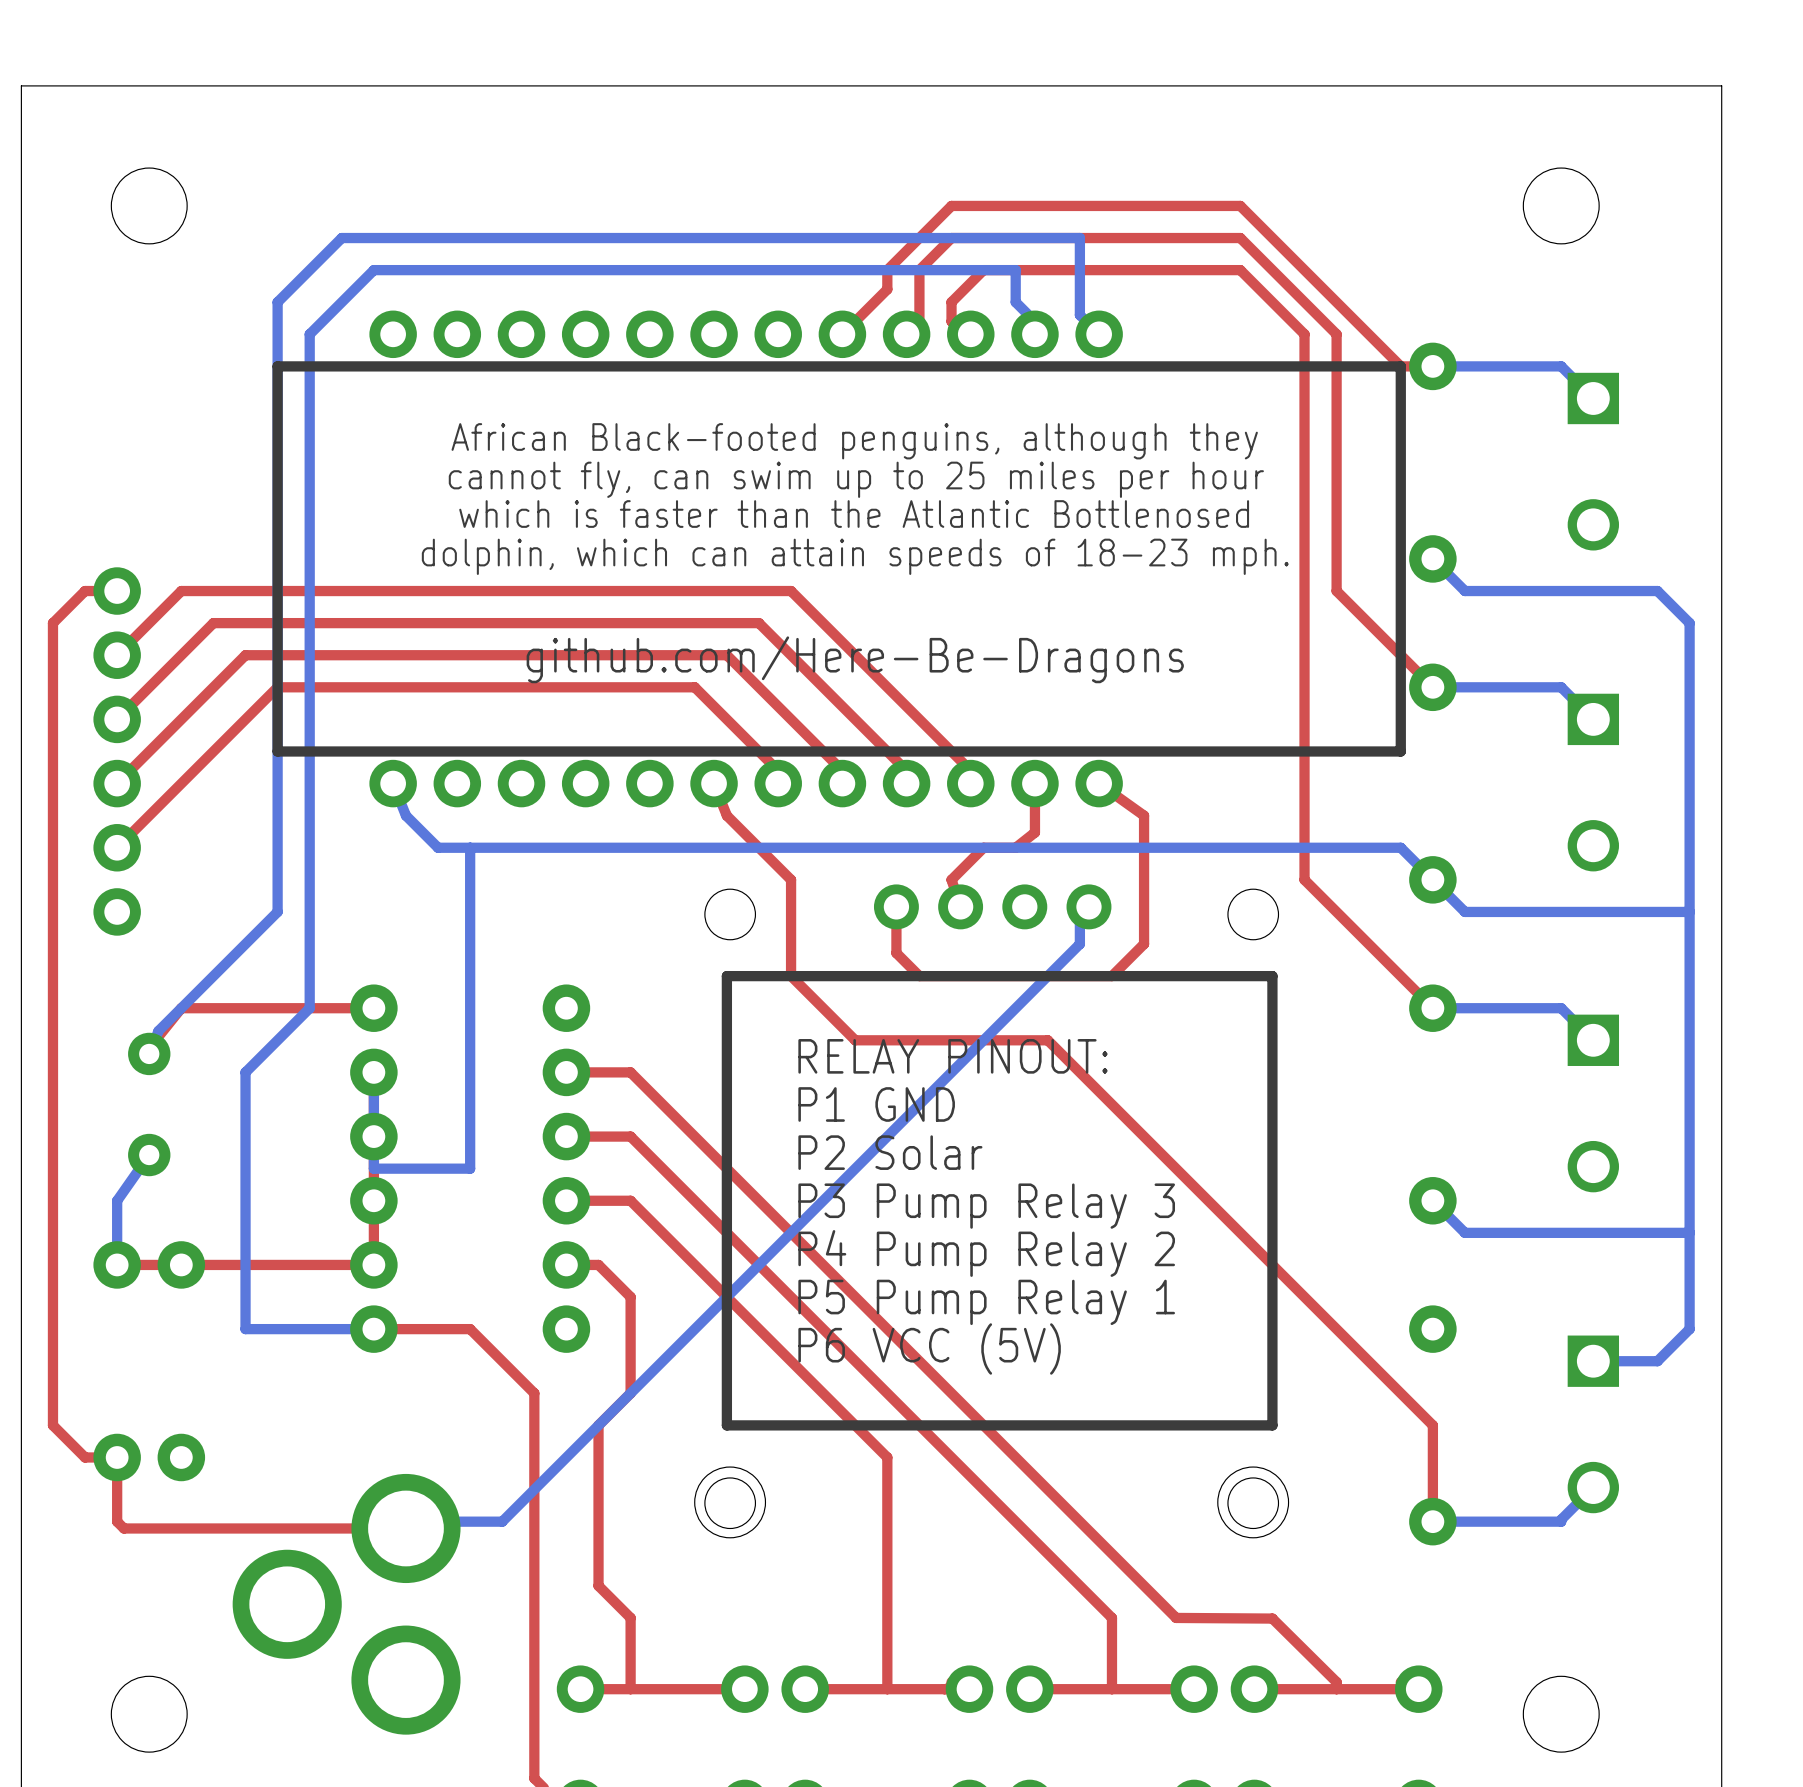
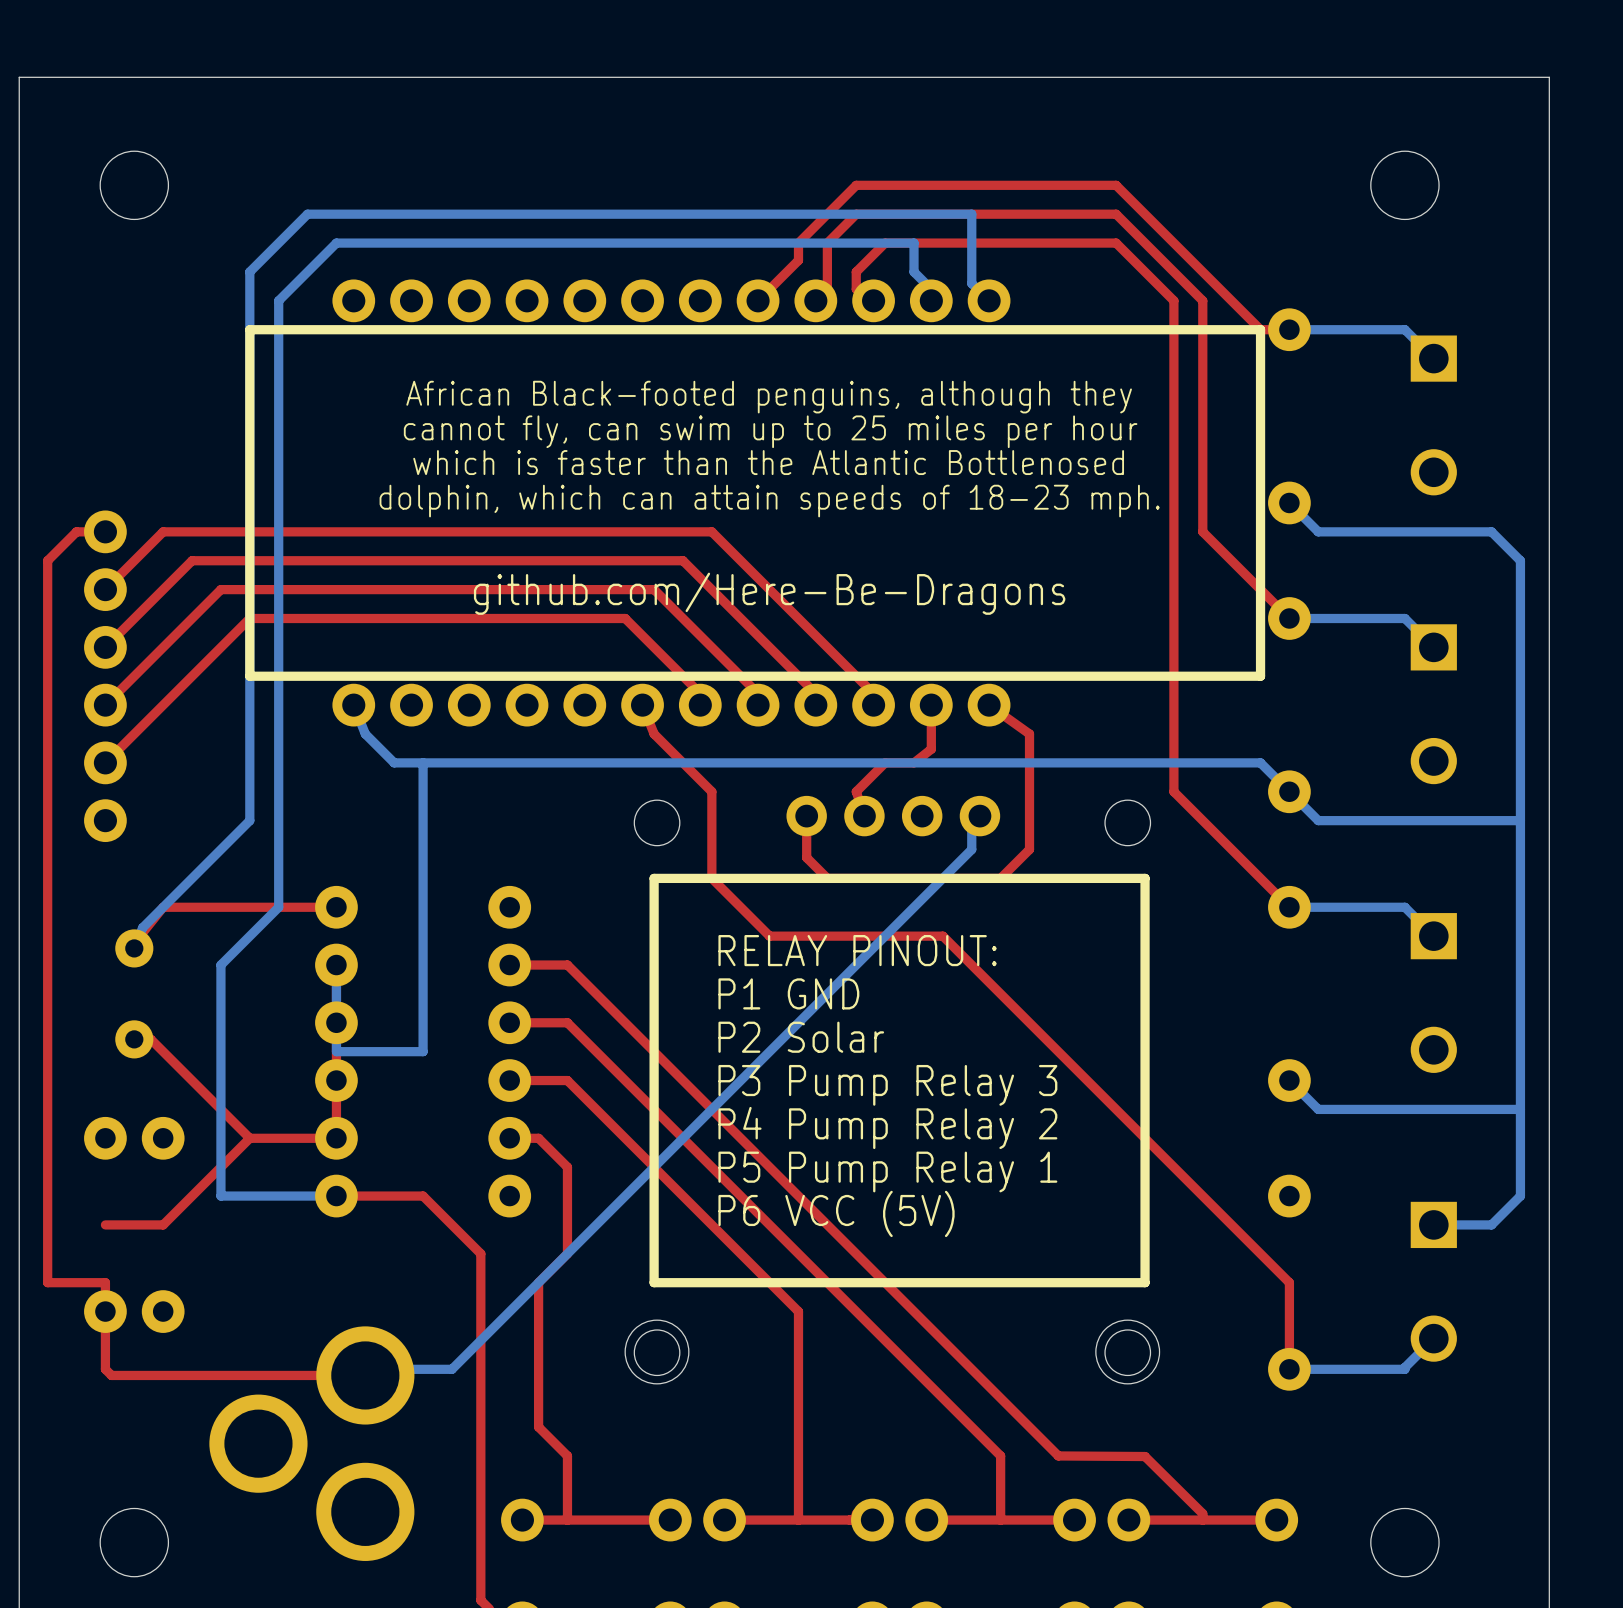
top track: none -> (134, 1039) (150, 1039) (249, 1138) (163, 1224) (105, 1224)
bottom track: (149, 1155) (117, 1200) (117, 1264) -> none
top track: (277, 1264) (117, 1264) -> none
top track: (52, 1425) (85, 1457) (117, 1457) -> (47, 1282) (105, 1282) (105, 1311)

